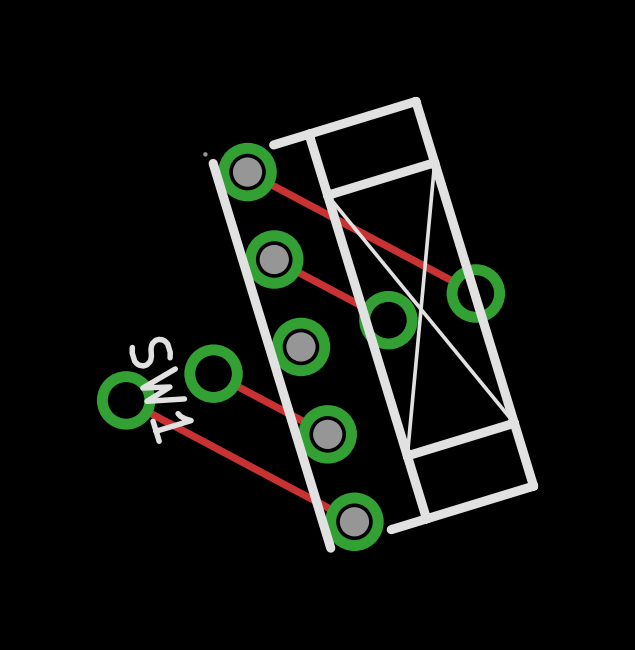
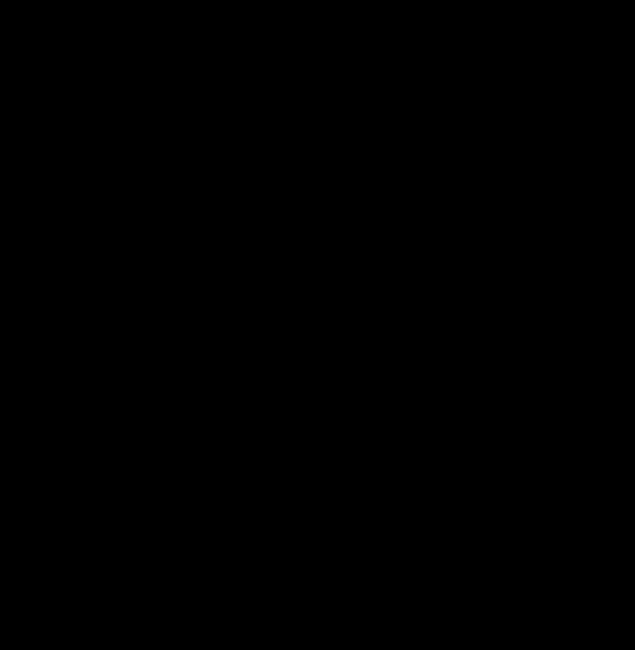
SW1: (317, 324) -> none

